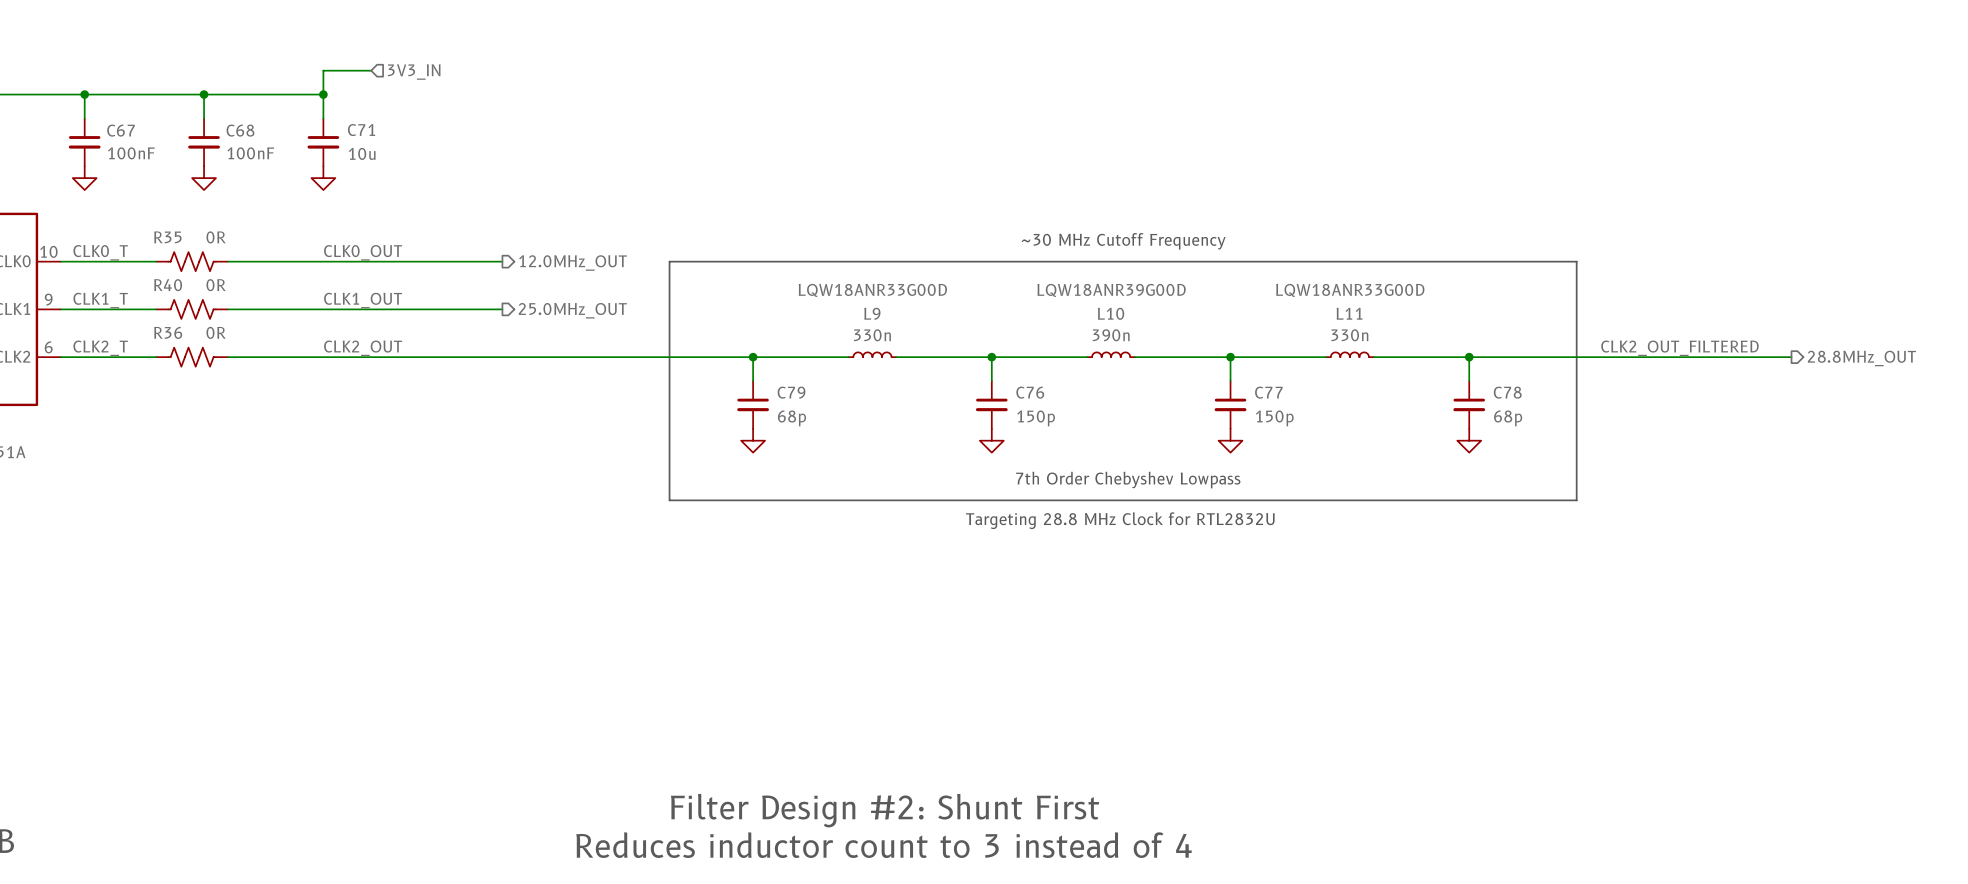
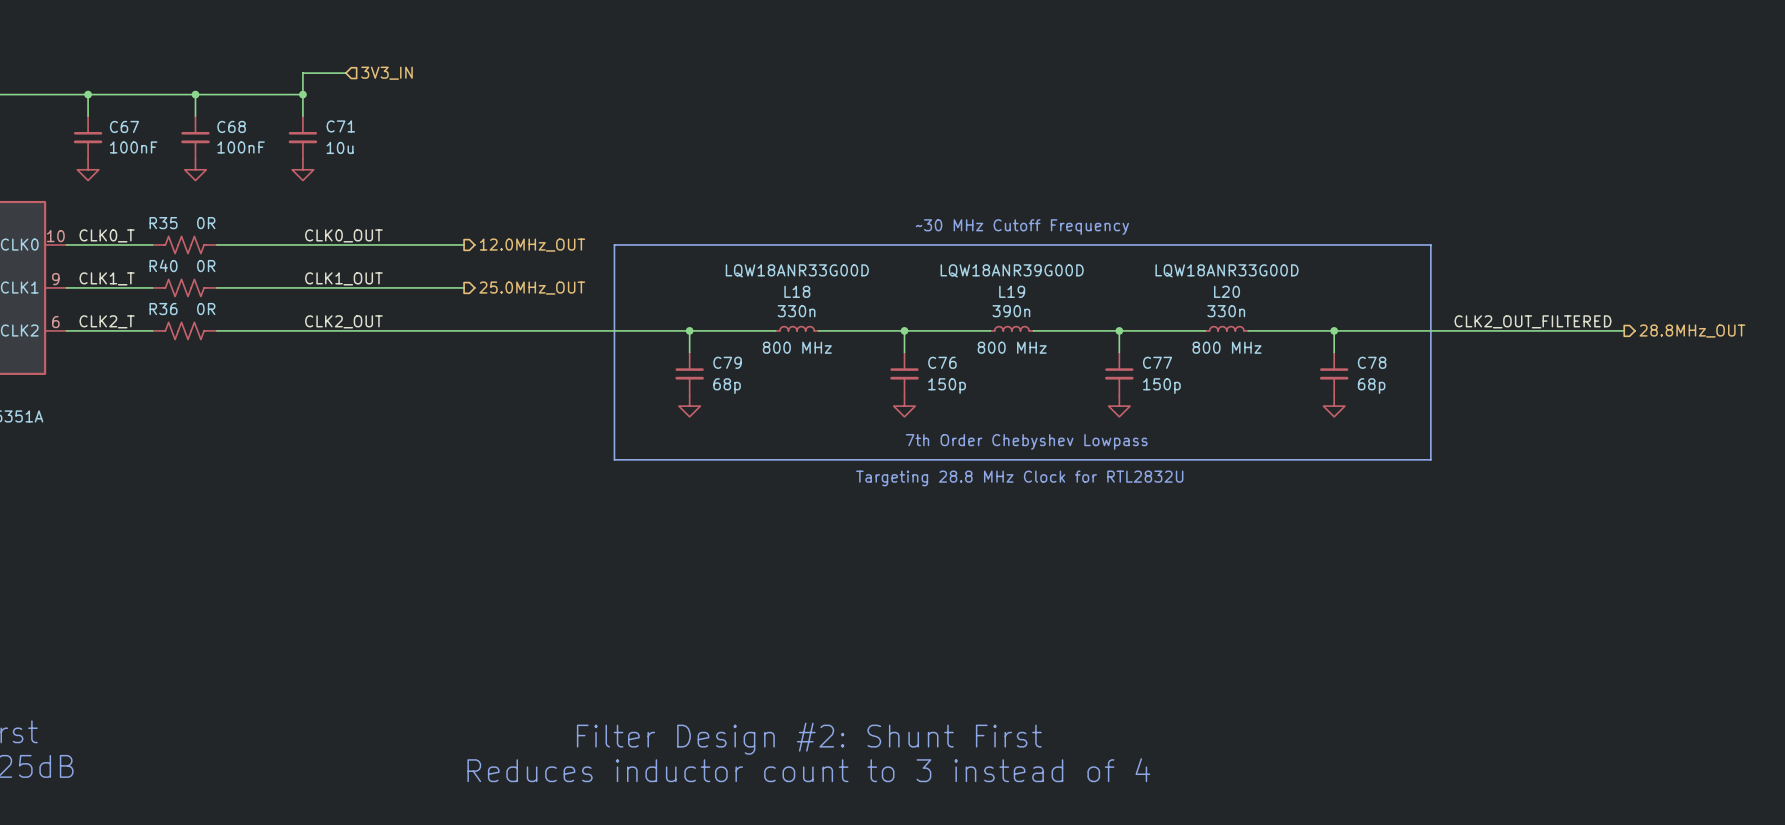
L9 name: L9 (872, 313) -> L18 (797, 291)
L10 name: L10 (1111, 313) -> L19 (1012, 291)
L11 name: L11 (1349, 313) -> L20 (1227, 291)
L9 text: none -> 800 MHz (797, 347)
L10 text: none -> 800 MHz (1012, 347)
L11 text: none -> 800 MHz (1227, 347)

